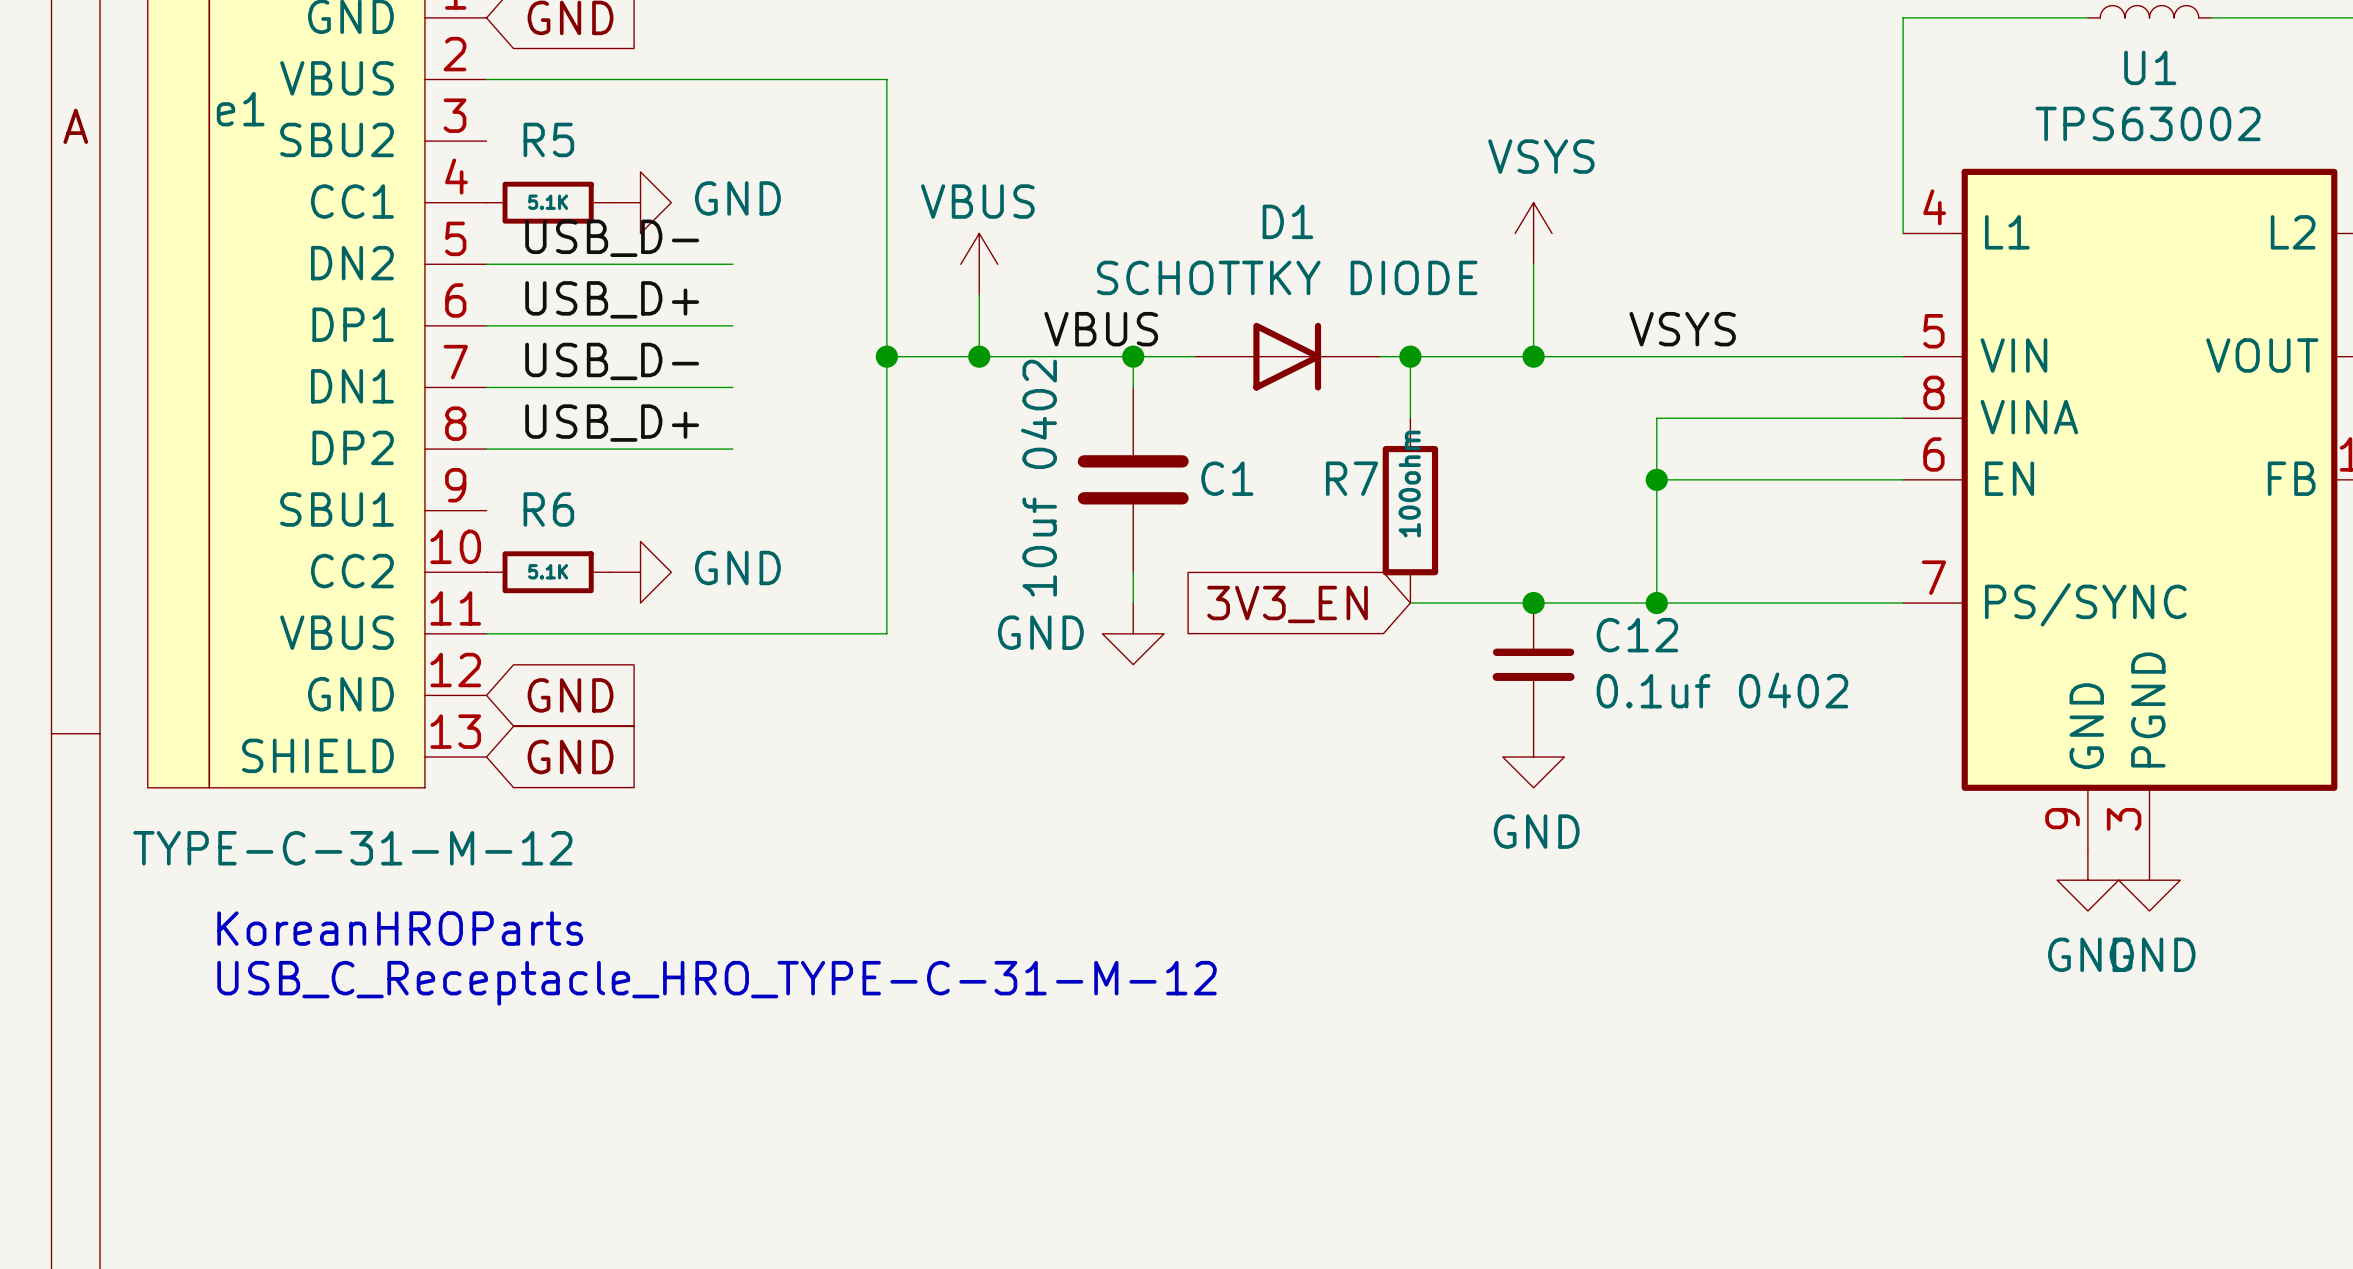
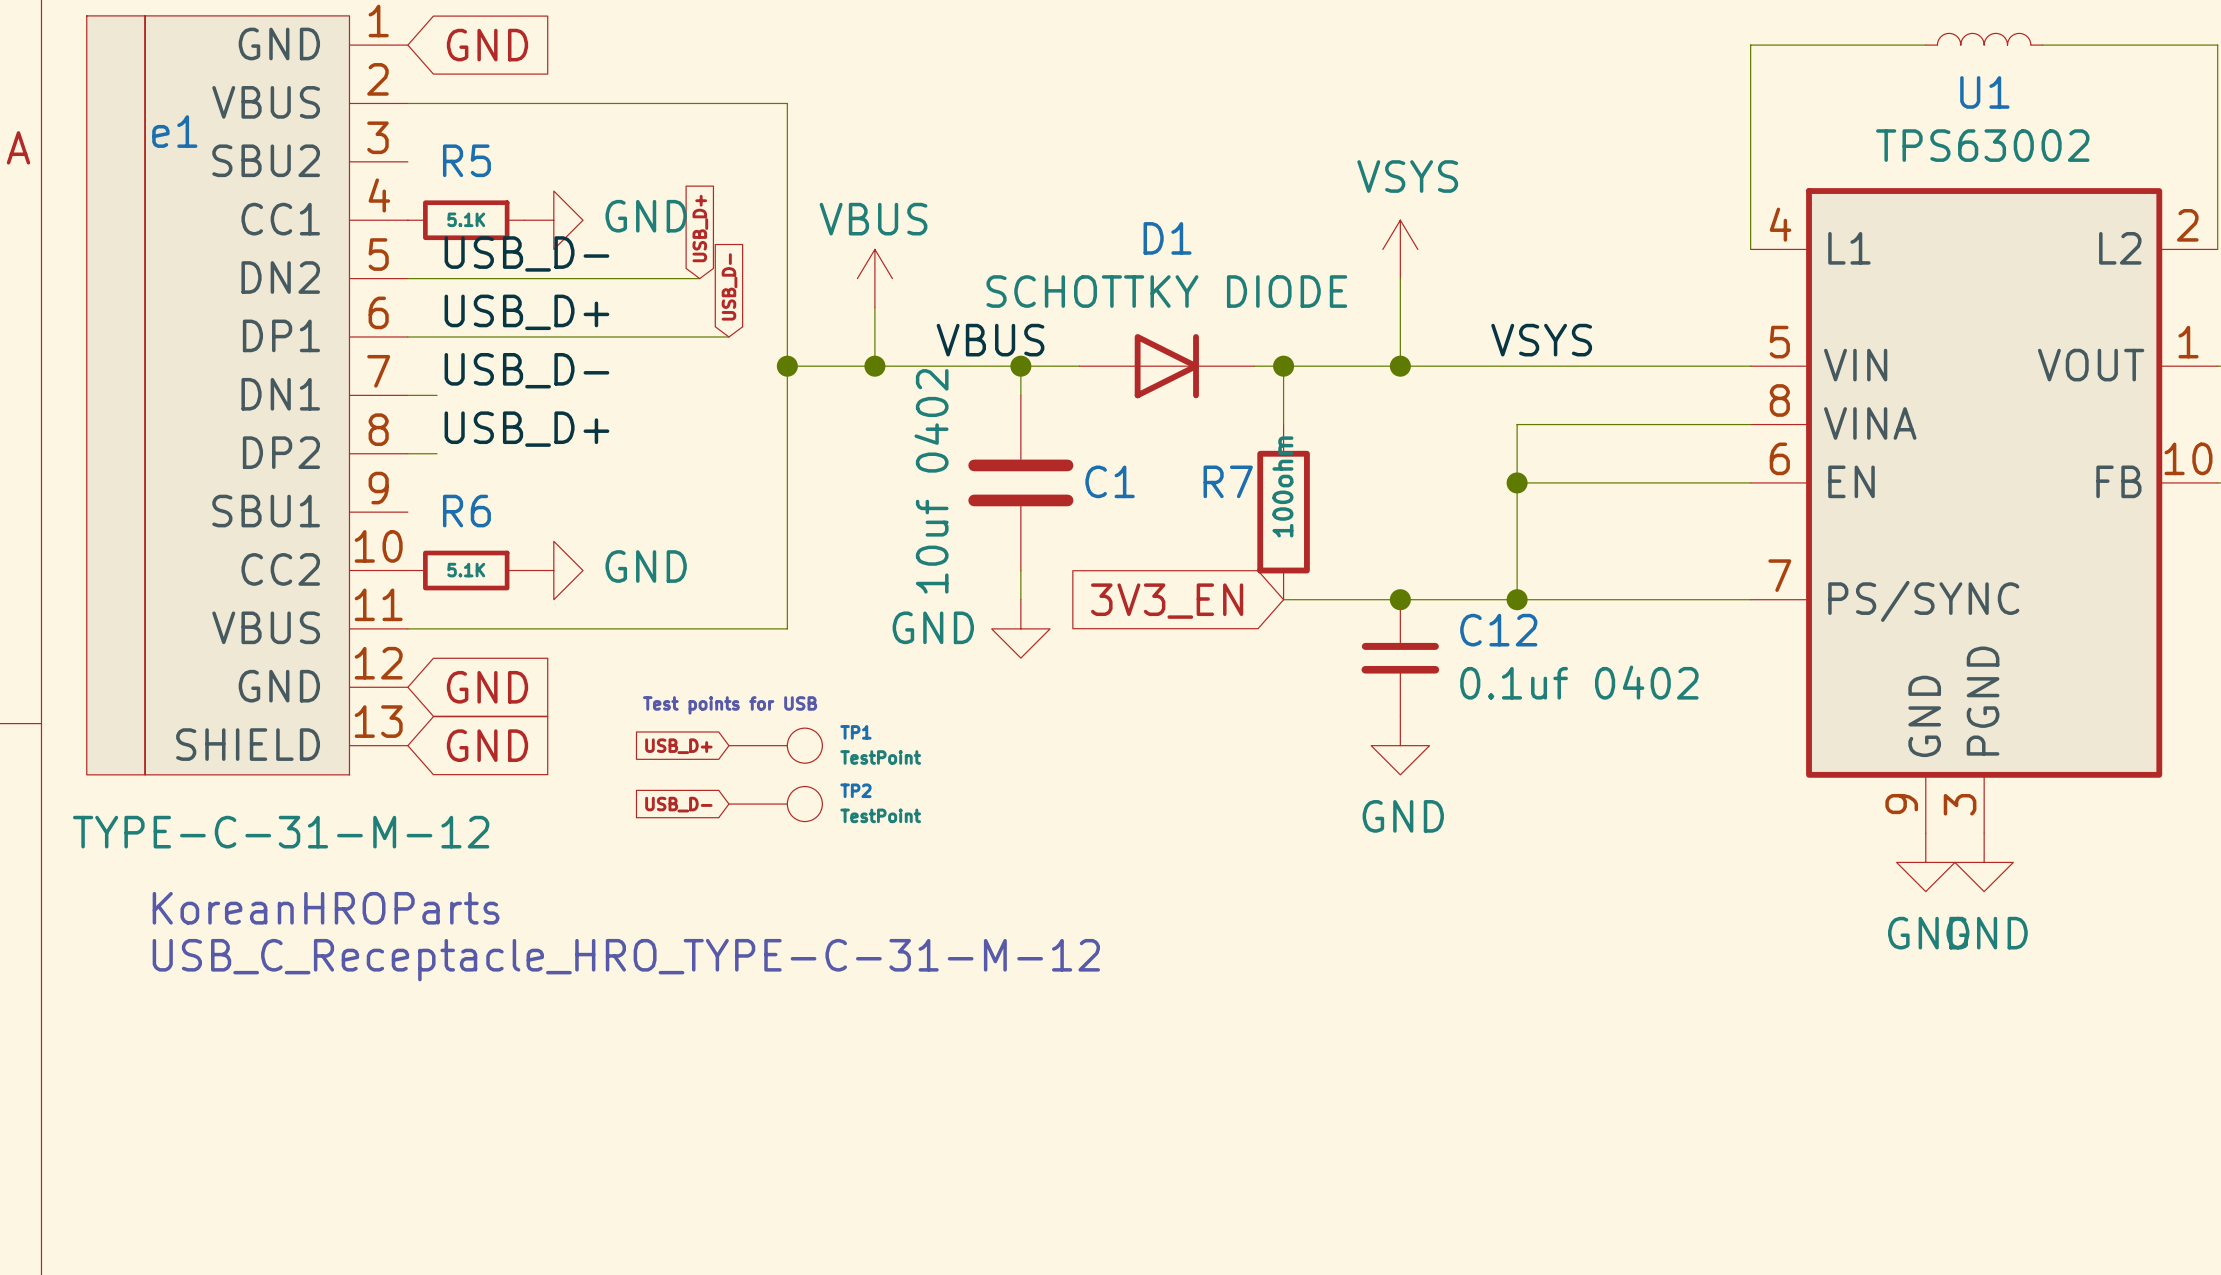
global label: none -> USB_D+ (700, 228)
wire: none -> (641, 278) (699, 278)
global label: none -> USB_D- (729, 286)
wire: none -> (641, 336) (728, 336)
wire: (517, 387) (732, 387) -> none
wire: (517, 449) (732, 449) -> none
text: none -> Test points for USB (730, 705)
global label: none -> USB_D+ (678, 746)
TP1: none -> TestPoint (775, 745)
TP2: none -> TestPoint (775, 804)
global label: none -> USB_D- (678, 804)

